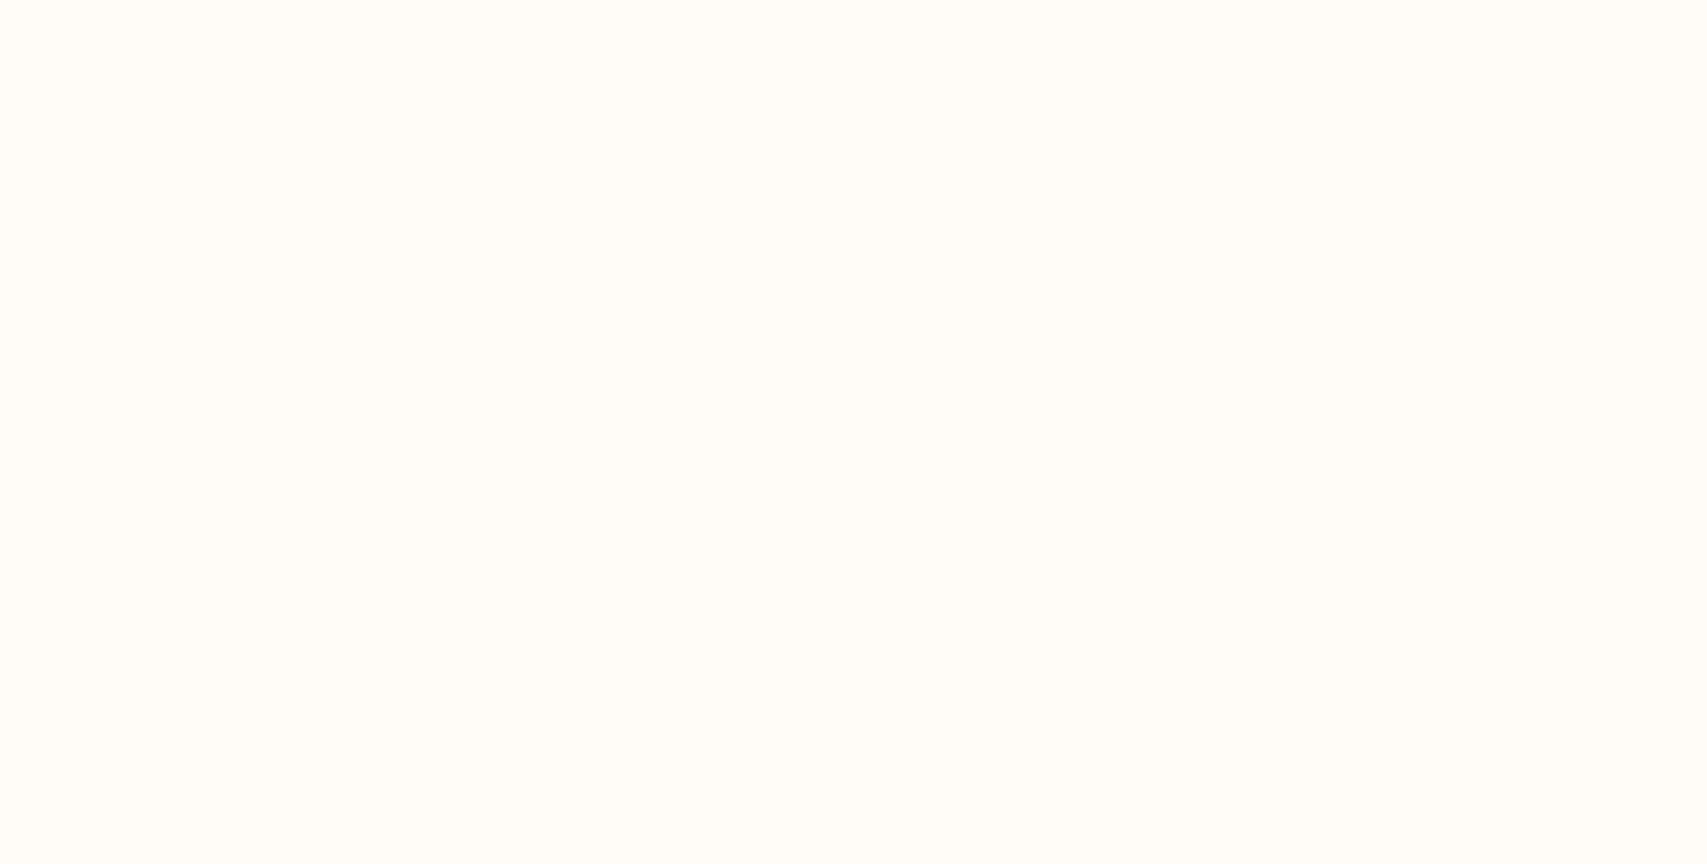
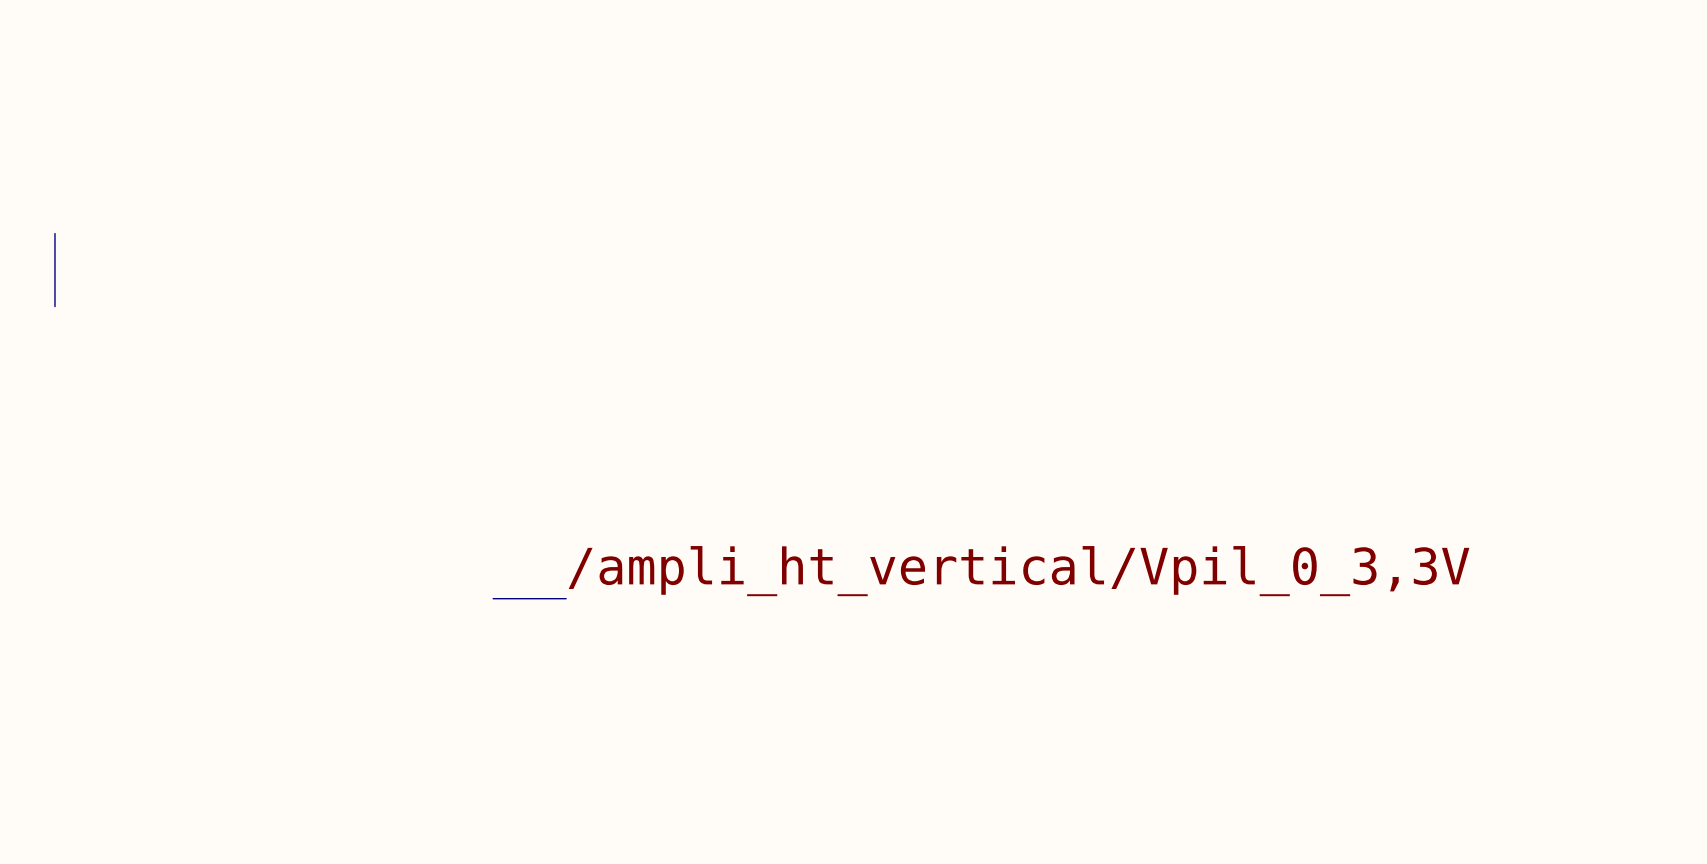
wire: none -> (54, 233) (54, 306)
label: none -> /ampli_ht_vertical/Vpil_0_3,3V (1019, 571)
wire: none -> (493, 598) (566, 598)

